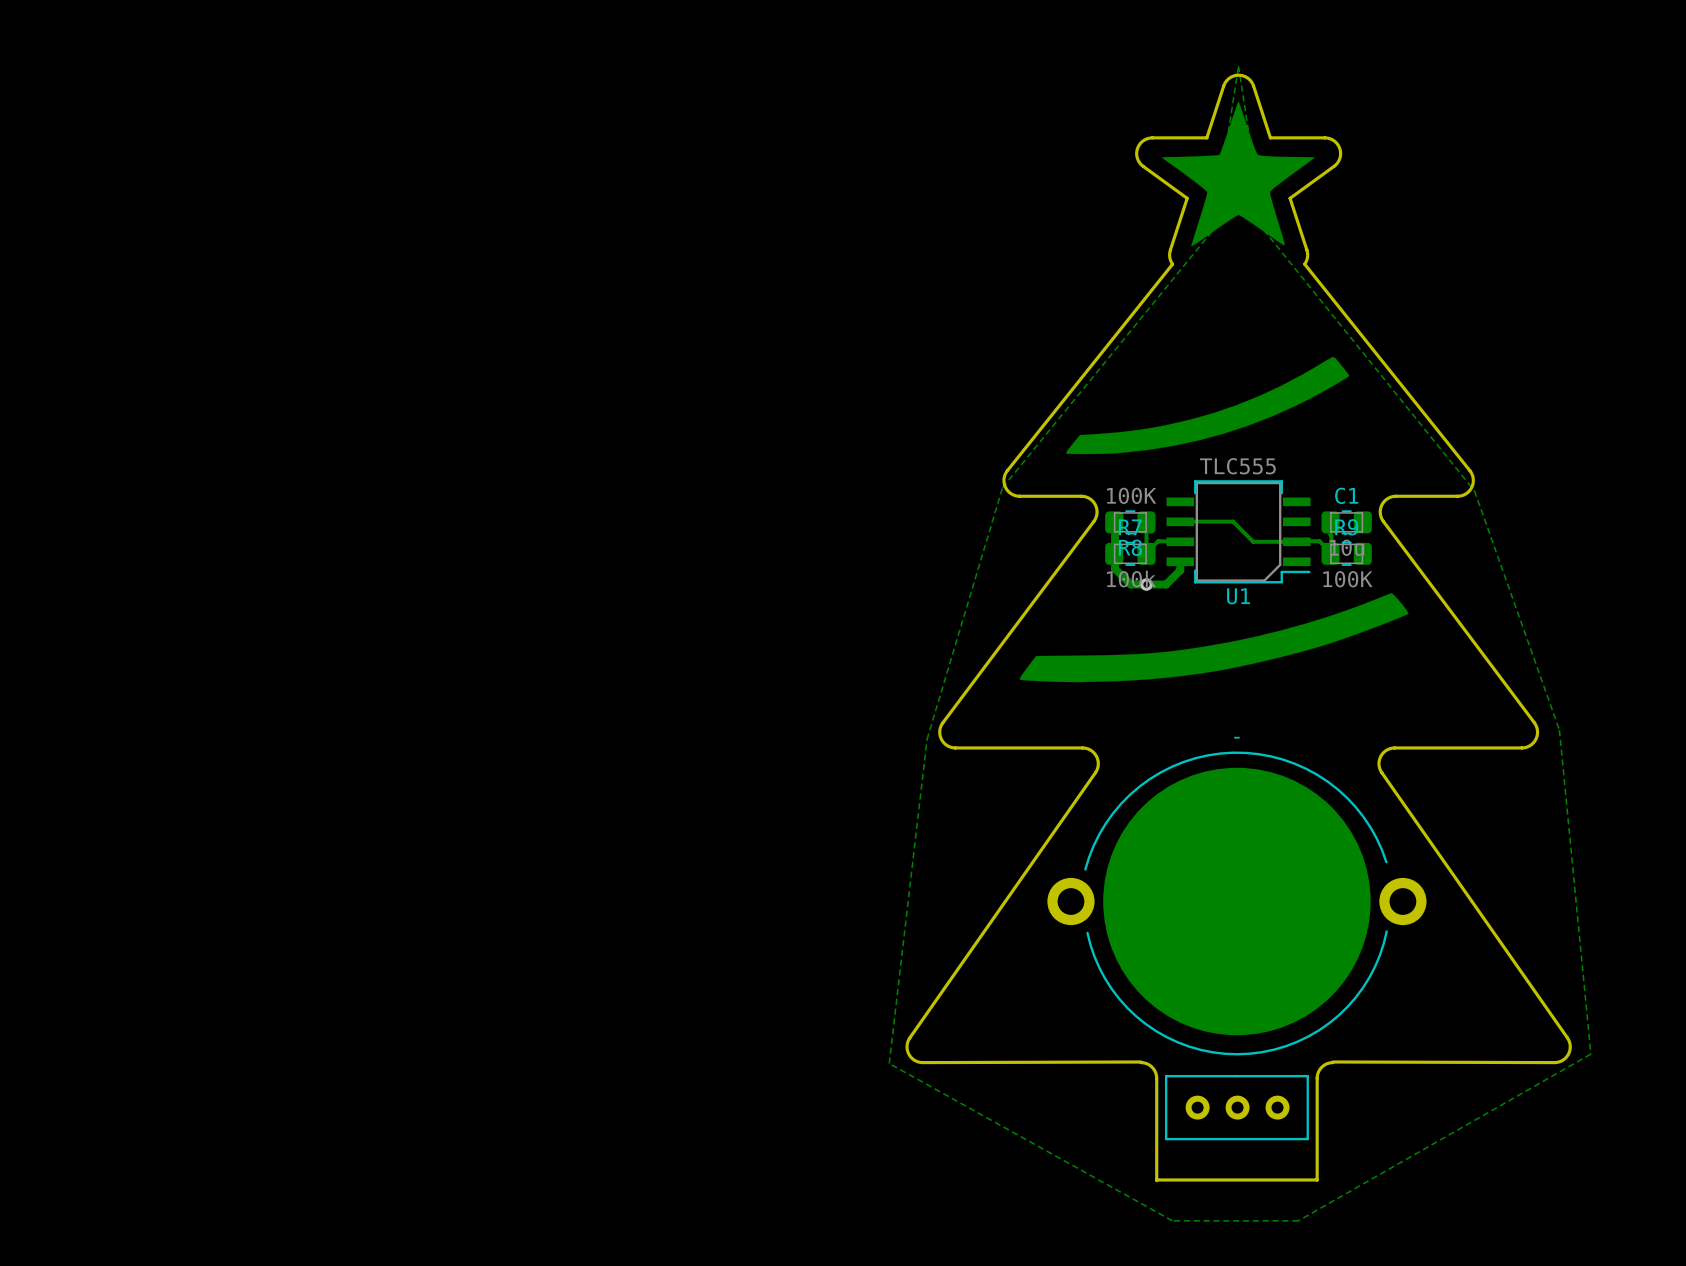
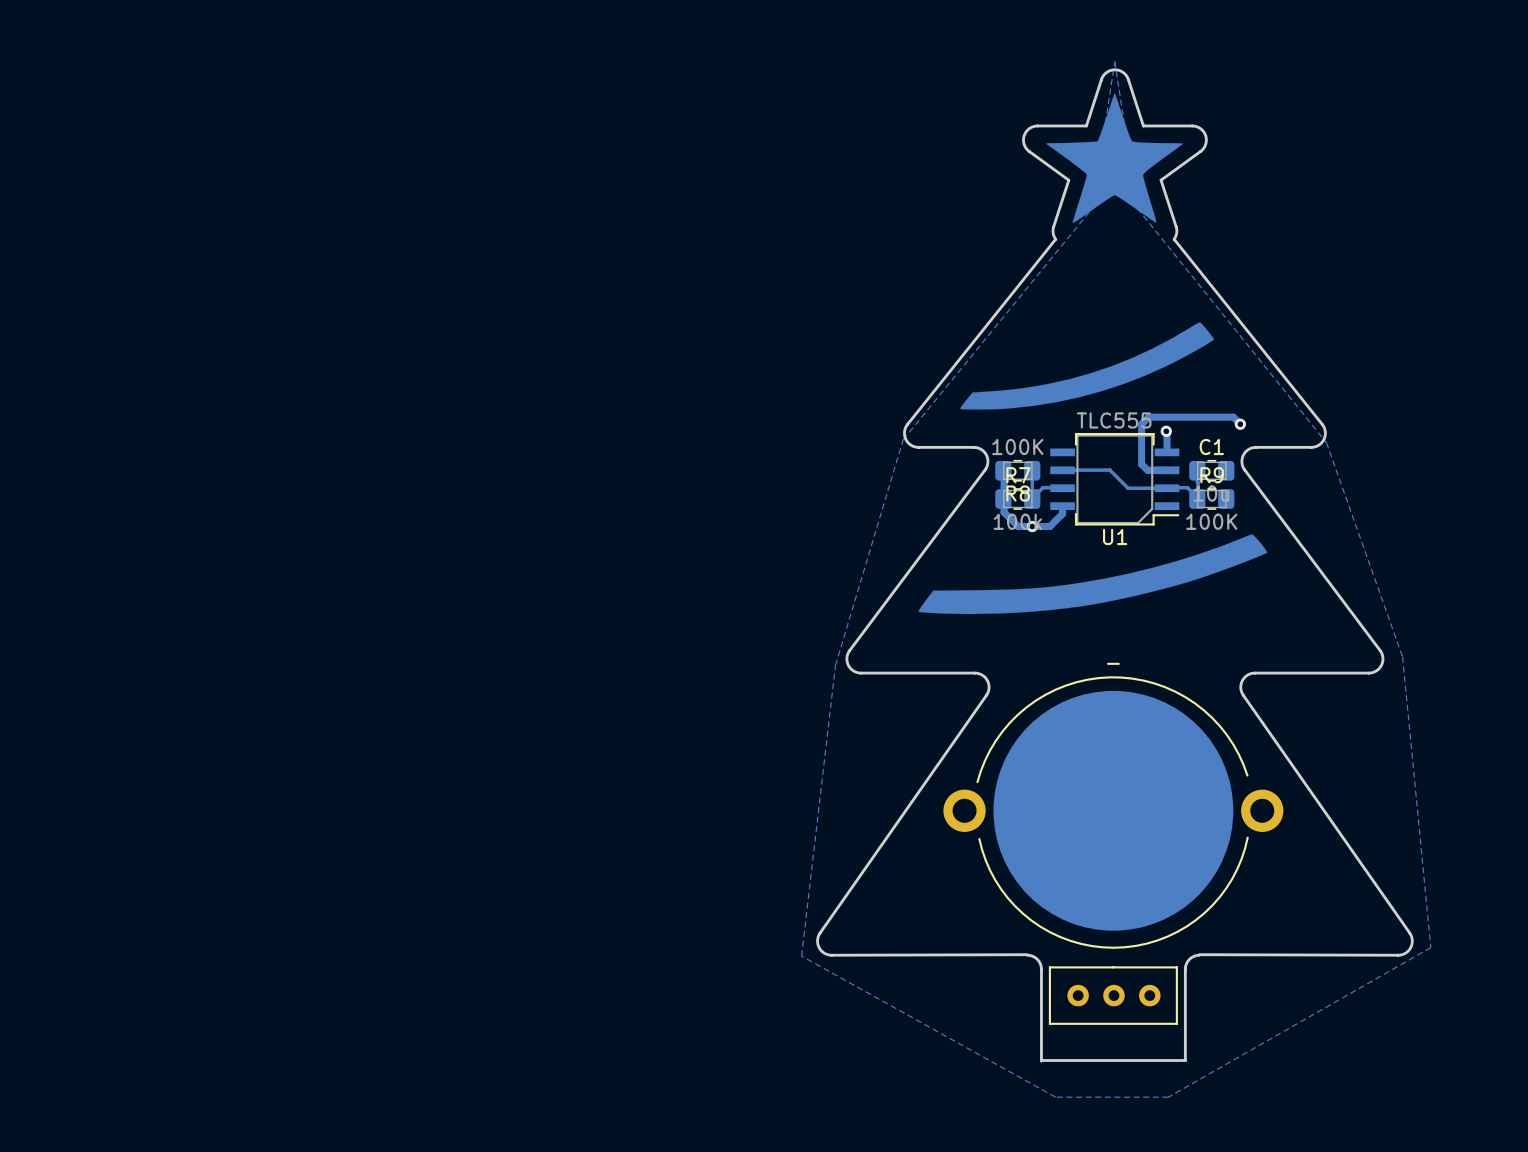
track: none -> (1240, 424) (1233, 417) (1148, 417) (1141, 424) (1141, 464) (1147, 470) (1167, 470)
via: none -> (1240, 424)
track: none -> (1166, 431) (1167, 452)
via: none -> (1166, 431)

